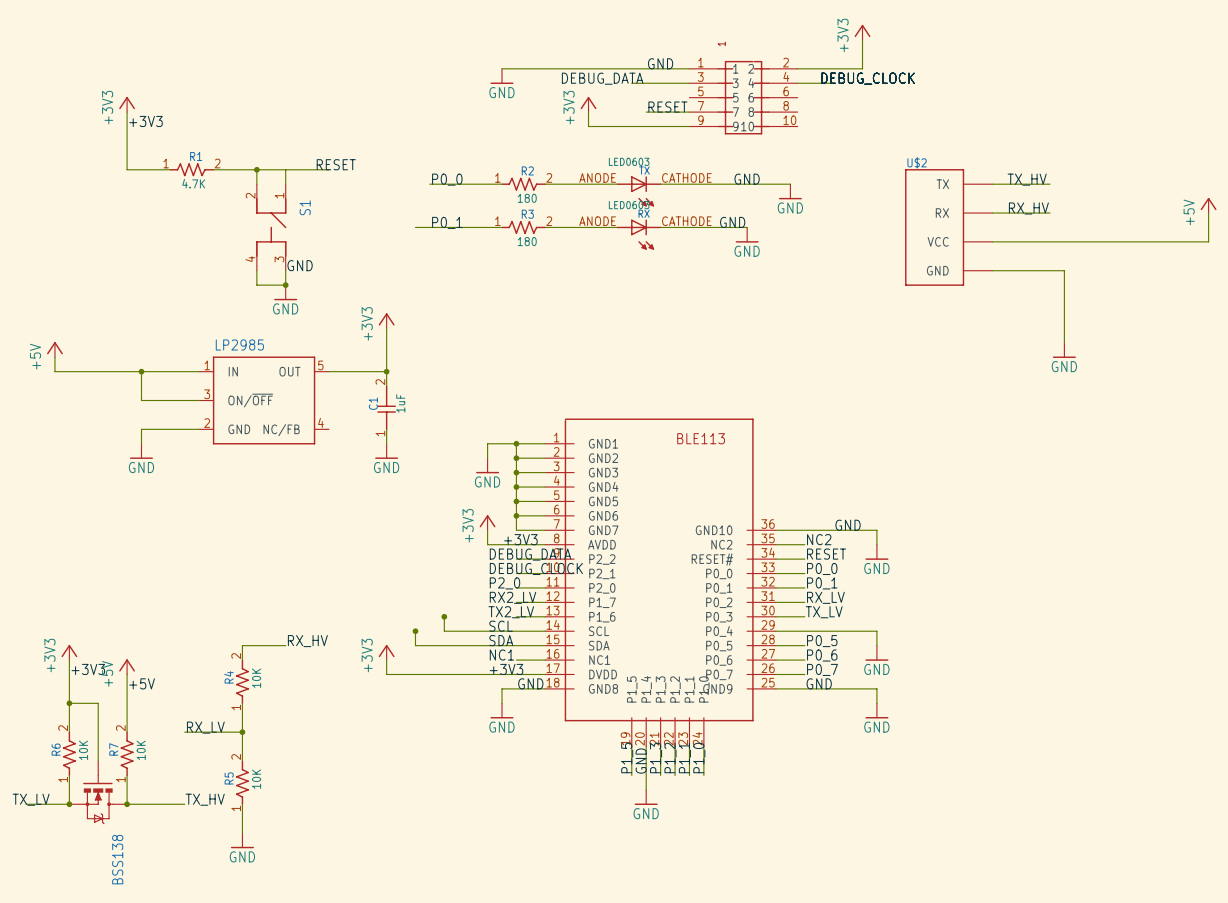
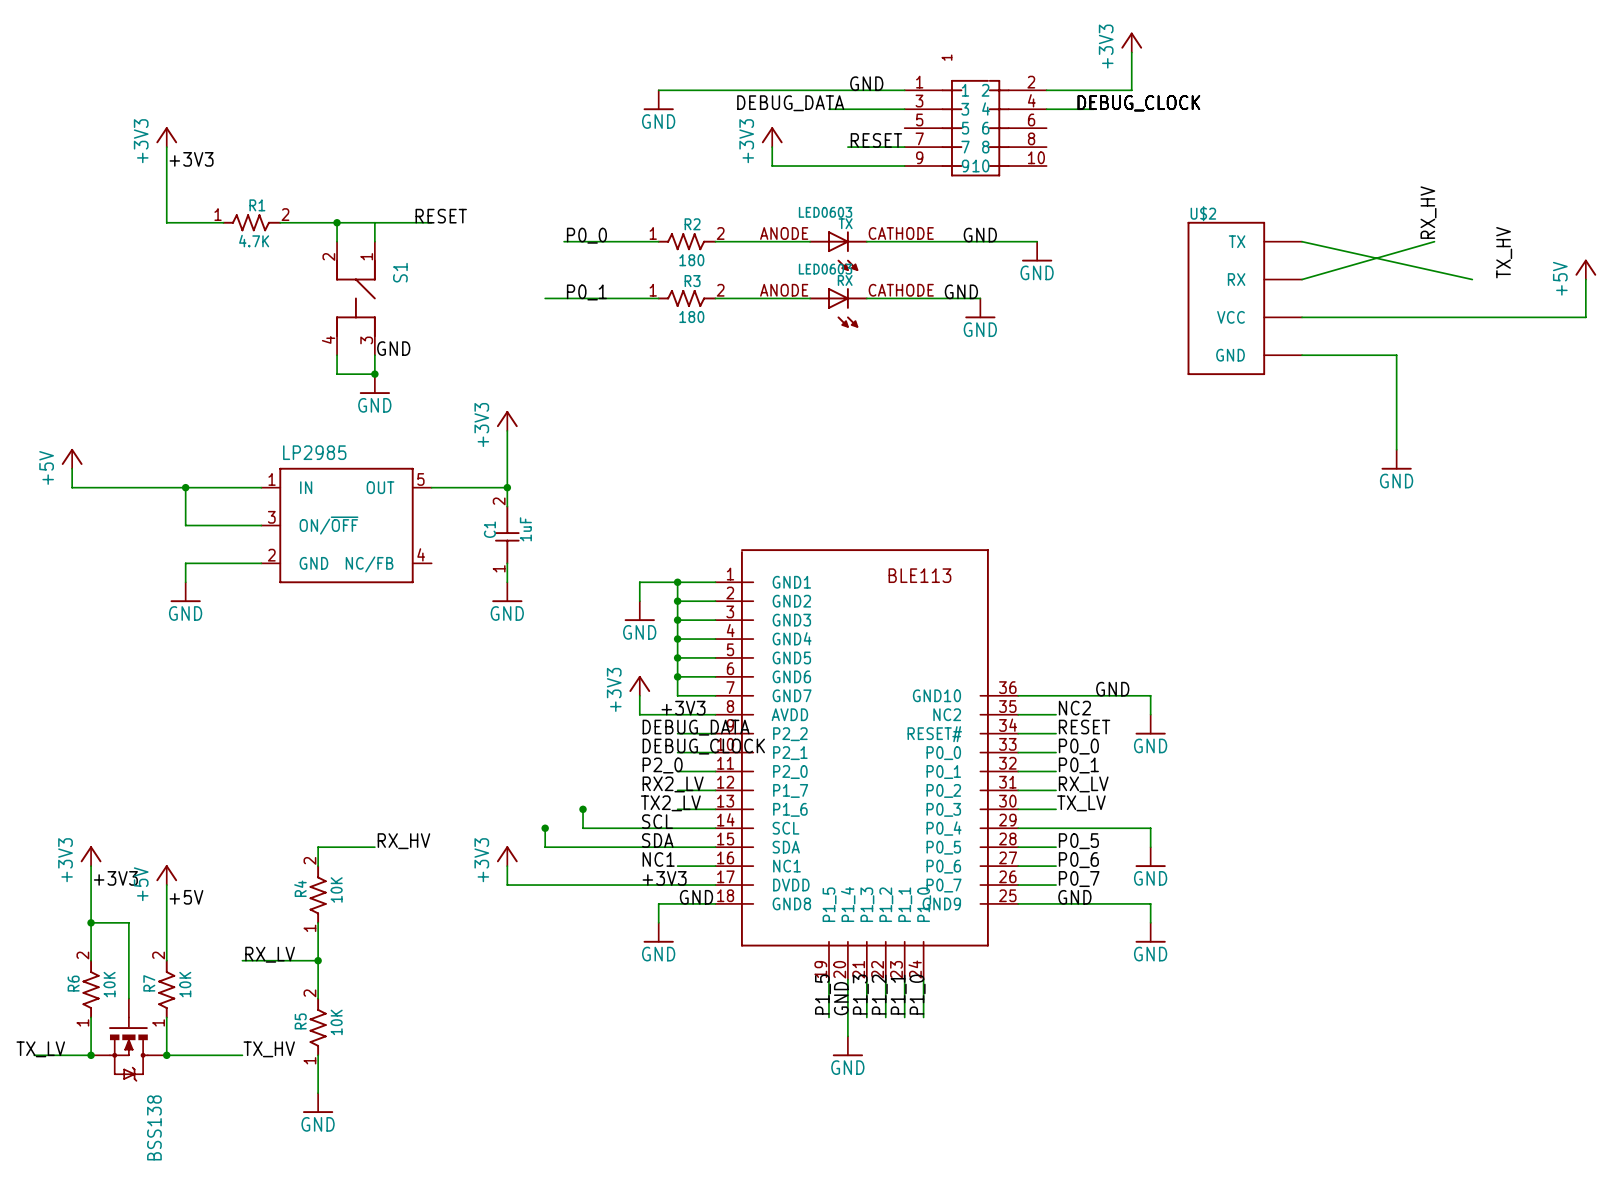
label: TX_HV (1027, 179) -> none
wire: (992, 184) (1049, 184) -> (1302, 241) (1472, 279)
label: none -> TX_HV (1504, 252)
label rotation: 0° (1028, 208) -> 90° counterclockwise (1428, 212)
label position: RX_HV (1028, 208) -> RX_HV (1428, 212)
wire: (992, 213) (1049, 213) -> (1302, 279) (1434, 241)

